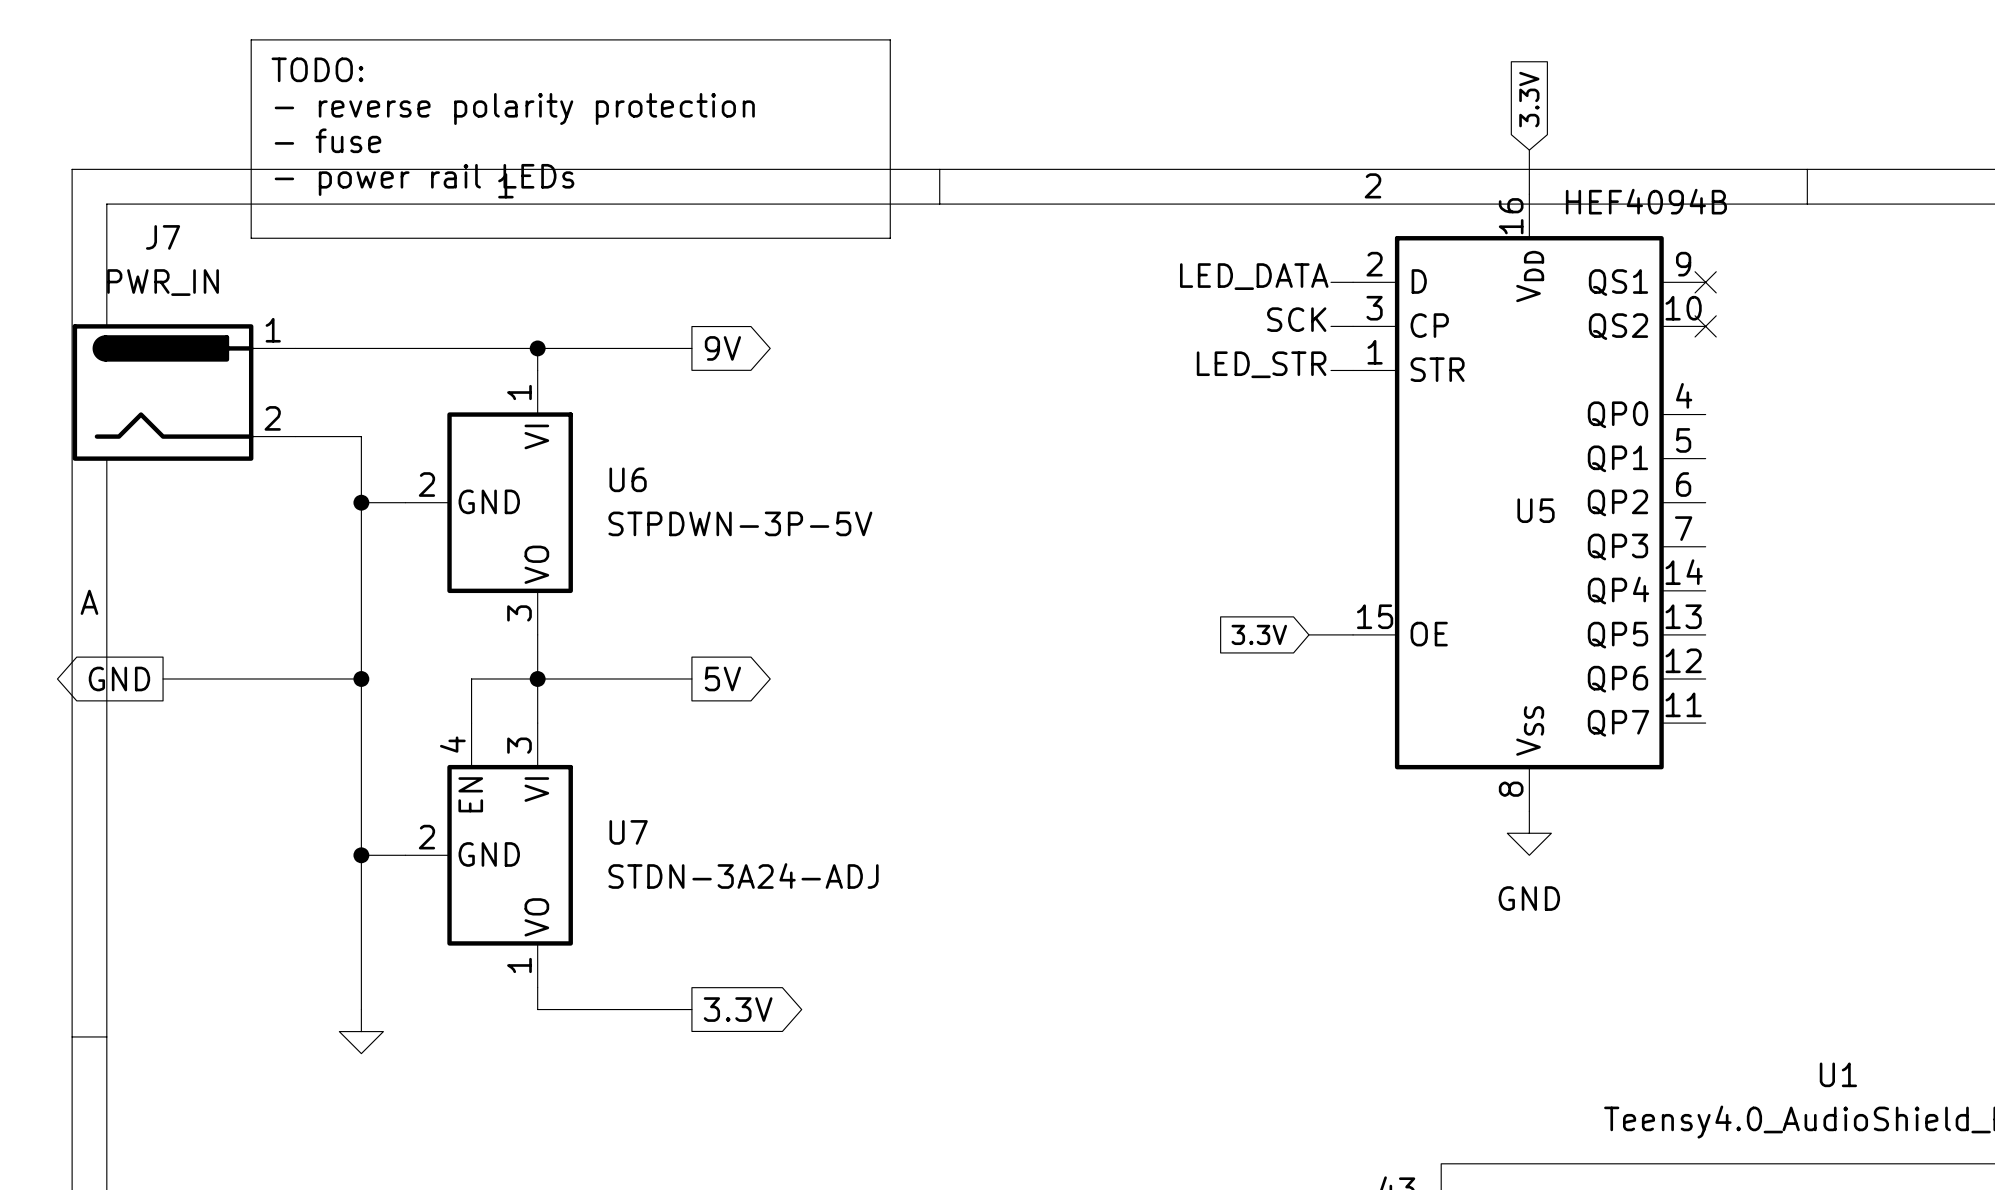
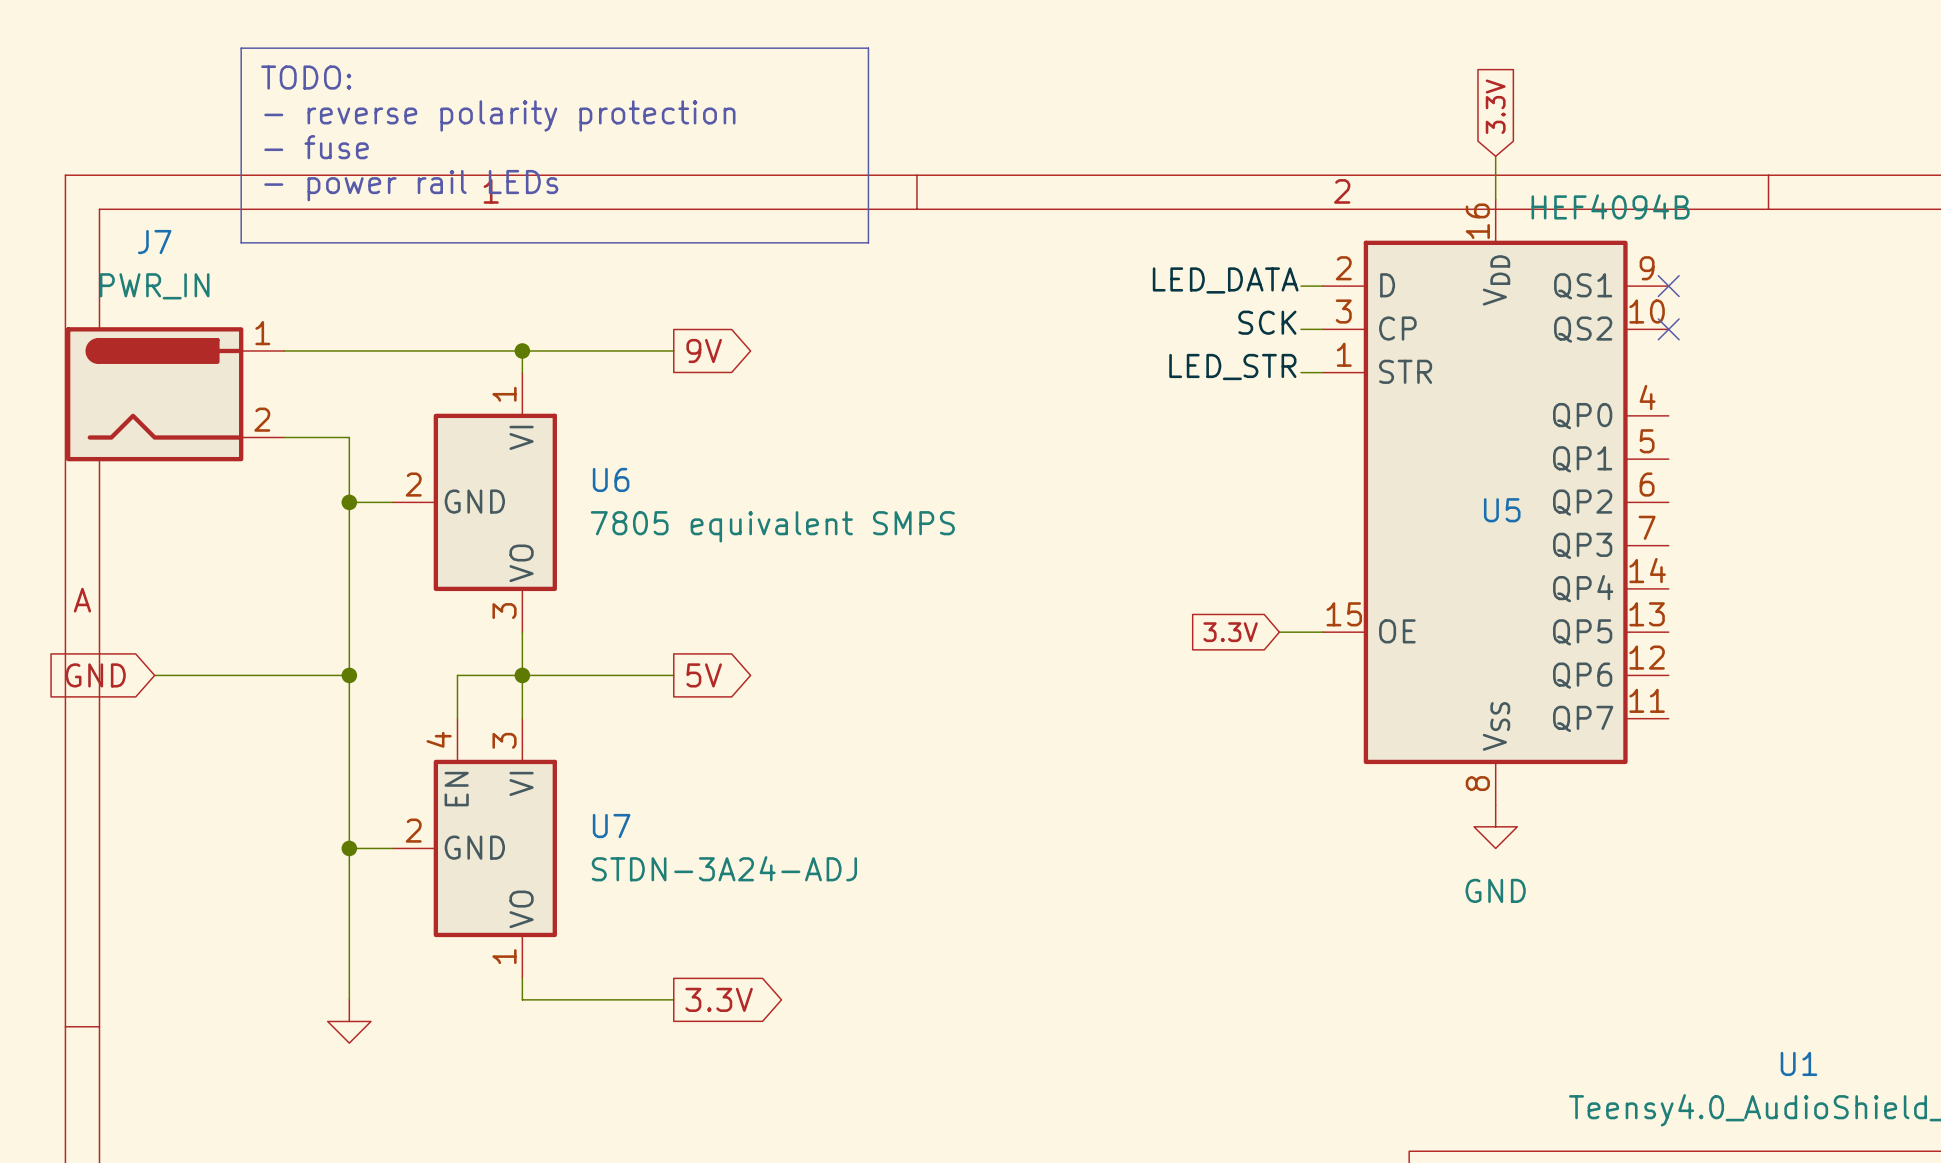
U6 value: STPDWN-3P-5V (740, 523) -> 7805 equivalent SMPS (772, 526)
global label shape: output (119, 678) -> input (95, 675)

